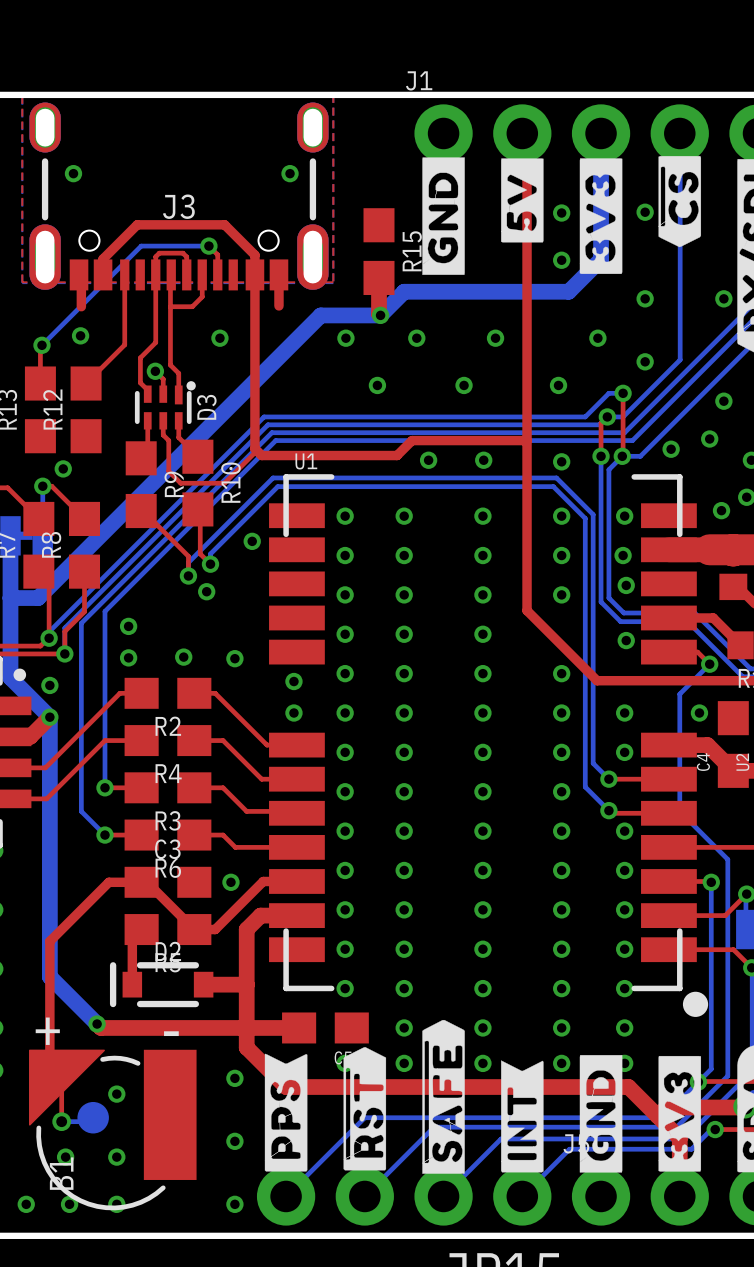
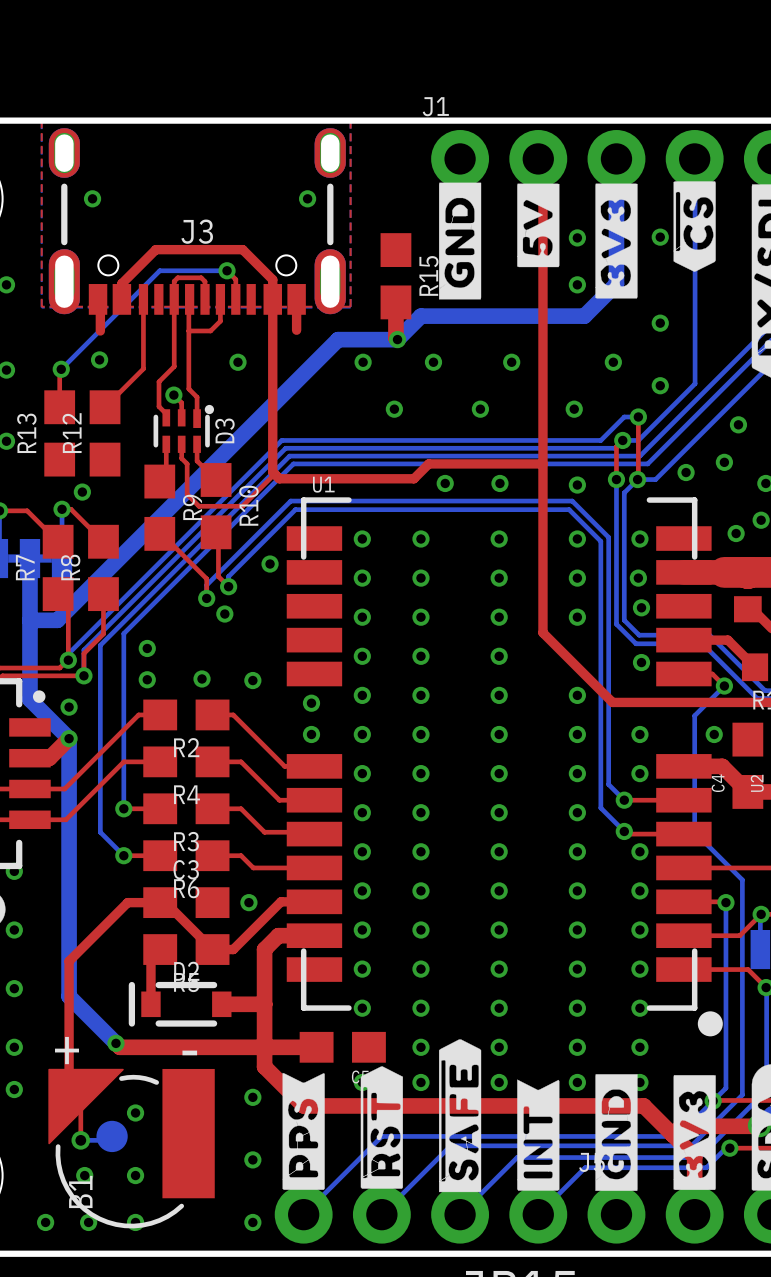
via: (723, 298) -> none

